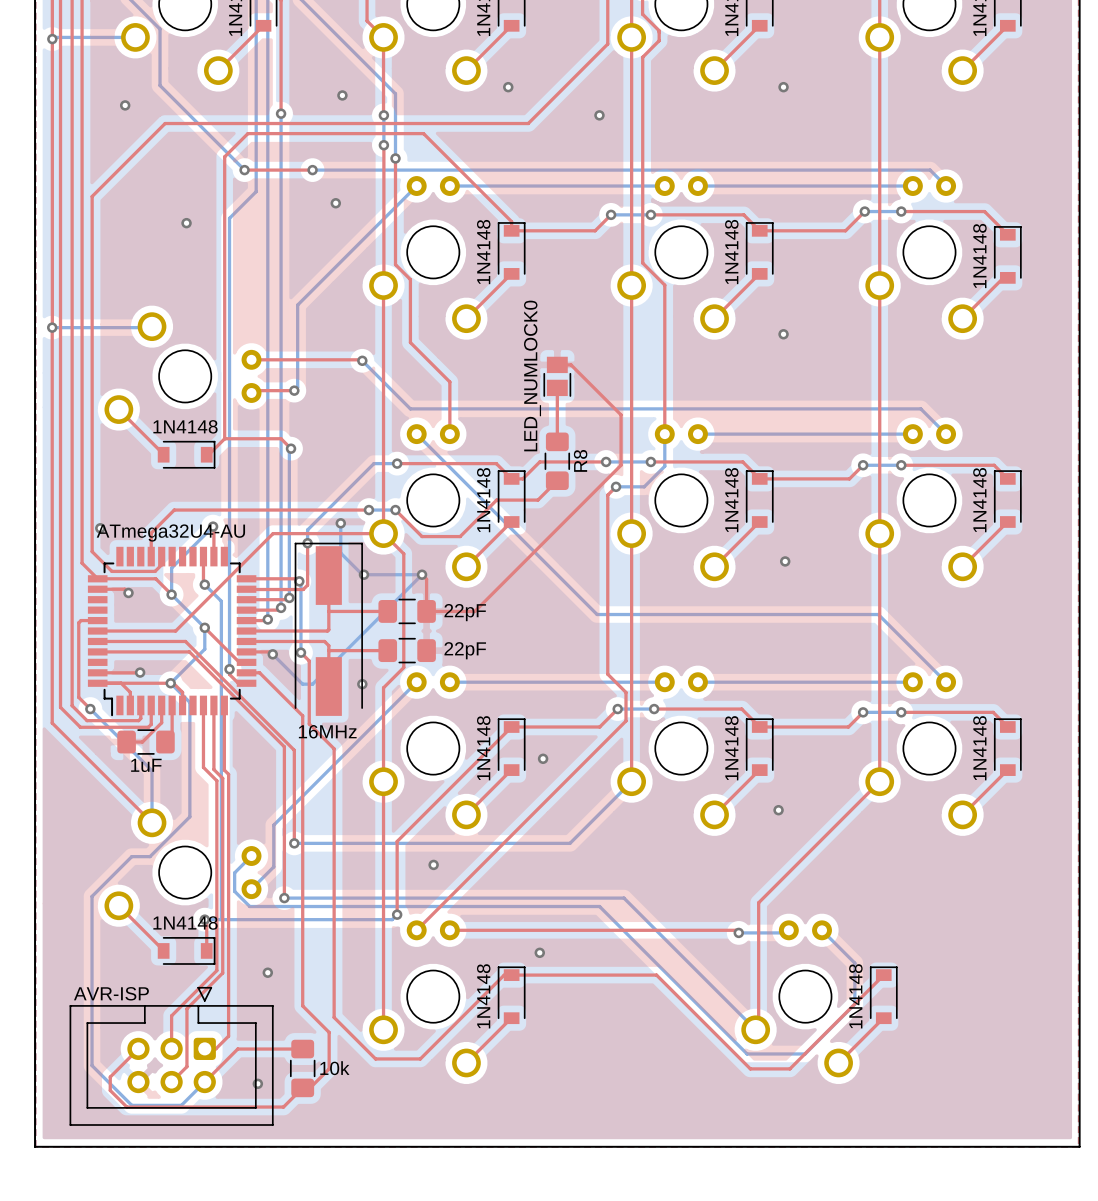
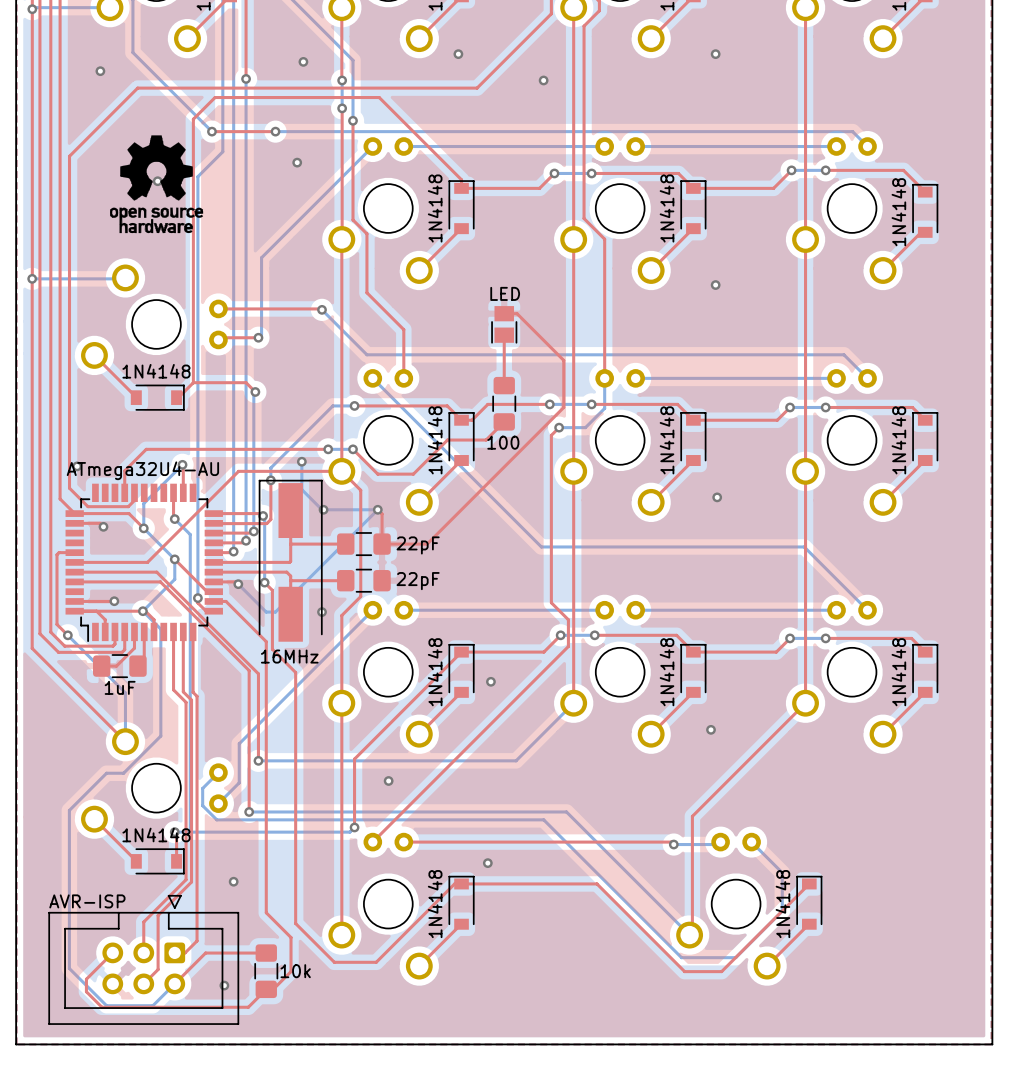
drawing: none -> [110, 135, 204, 234]
LED_NUMLOCK0 value: none -> LED (505, 293)
LED_NUMLOCK0 name: LED_NUMLOCK0 (532, 375) -> none
R8 name: R8 (580, 460) -> none
R8 value: none -> 100 (503, 442)

